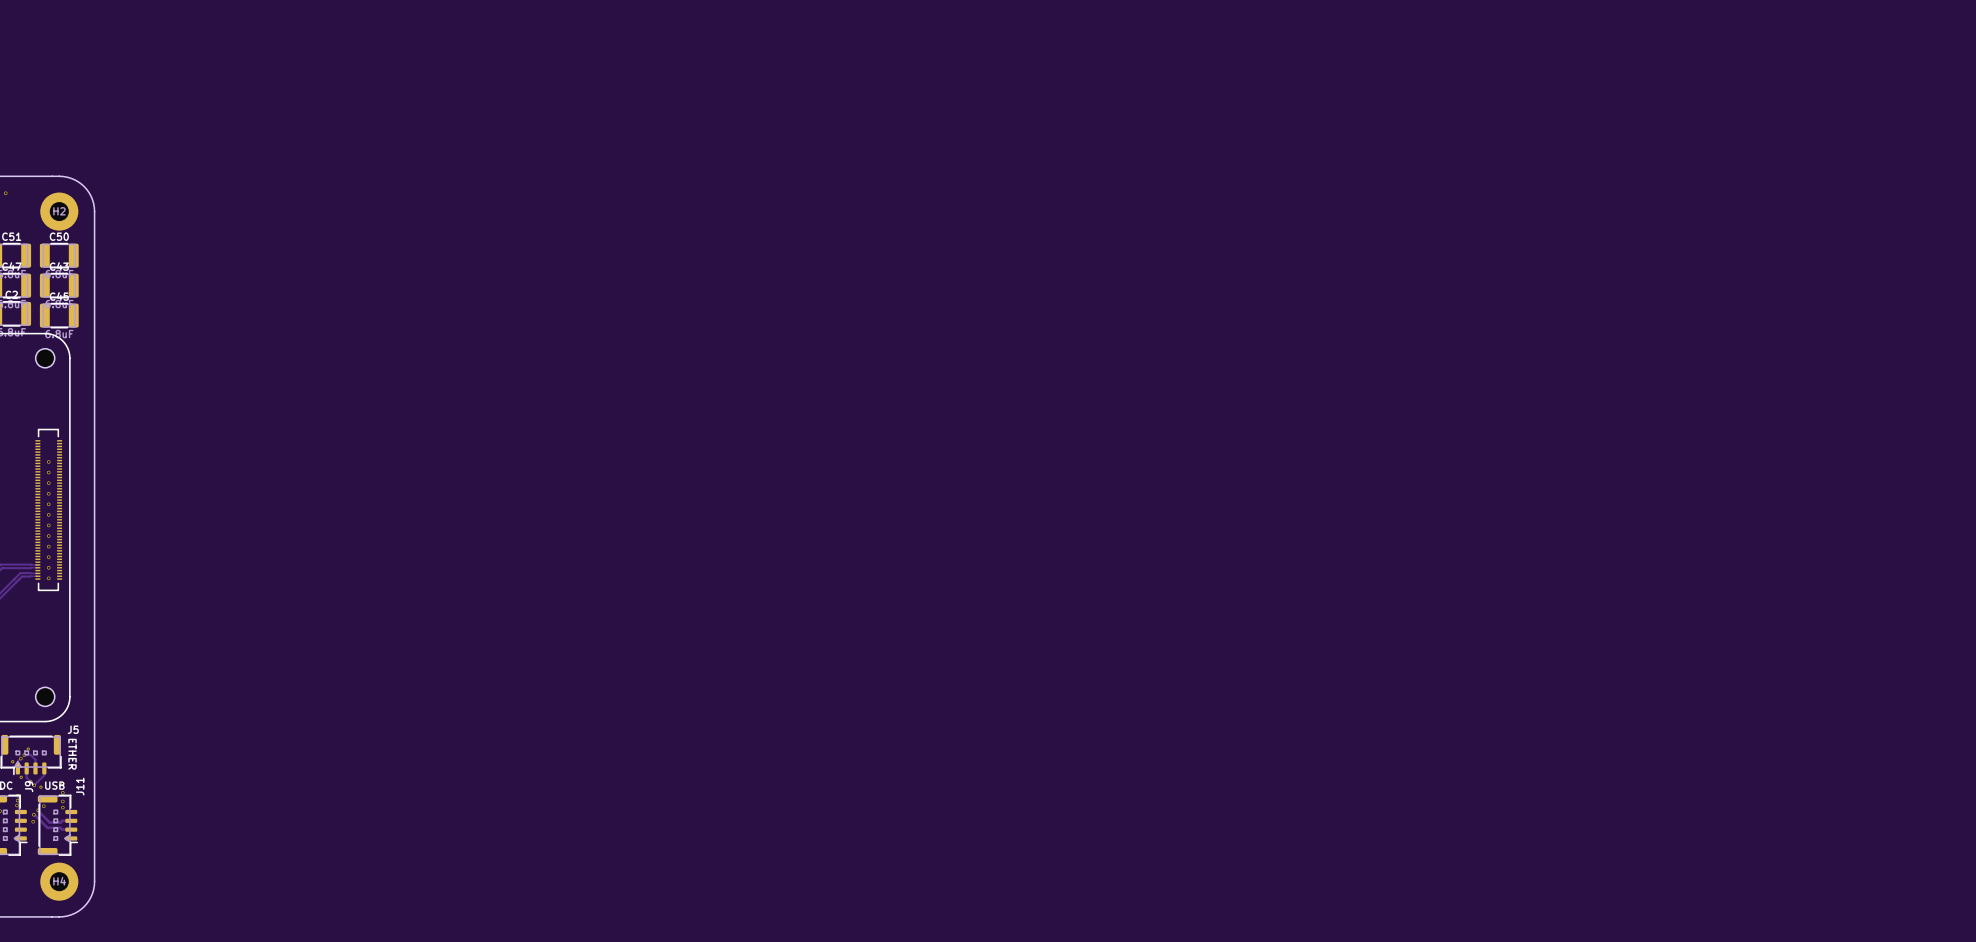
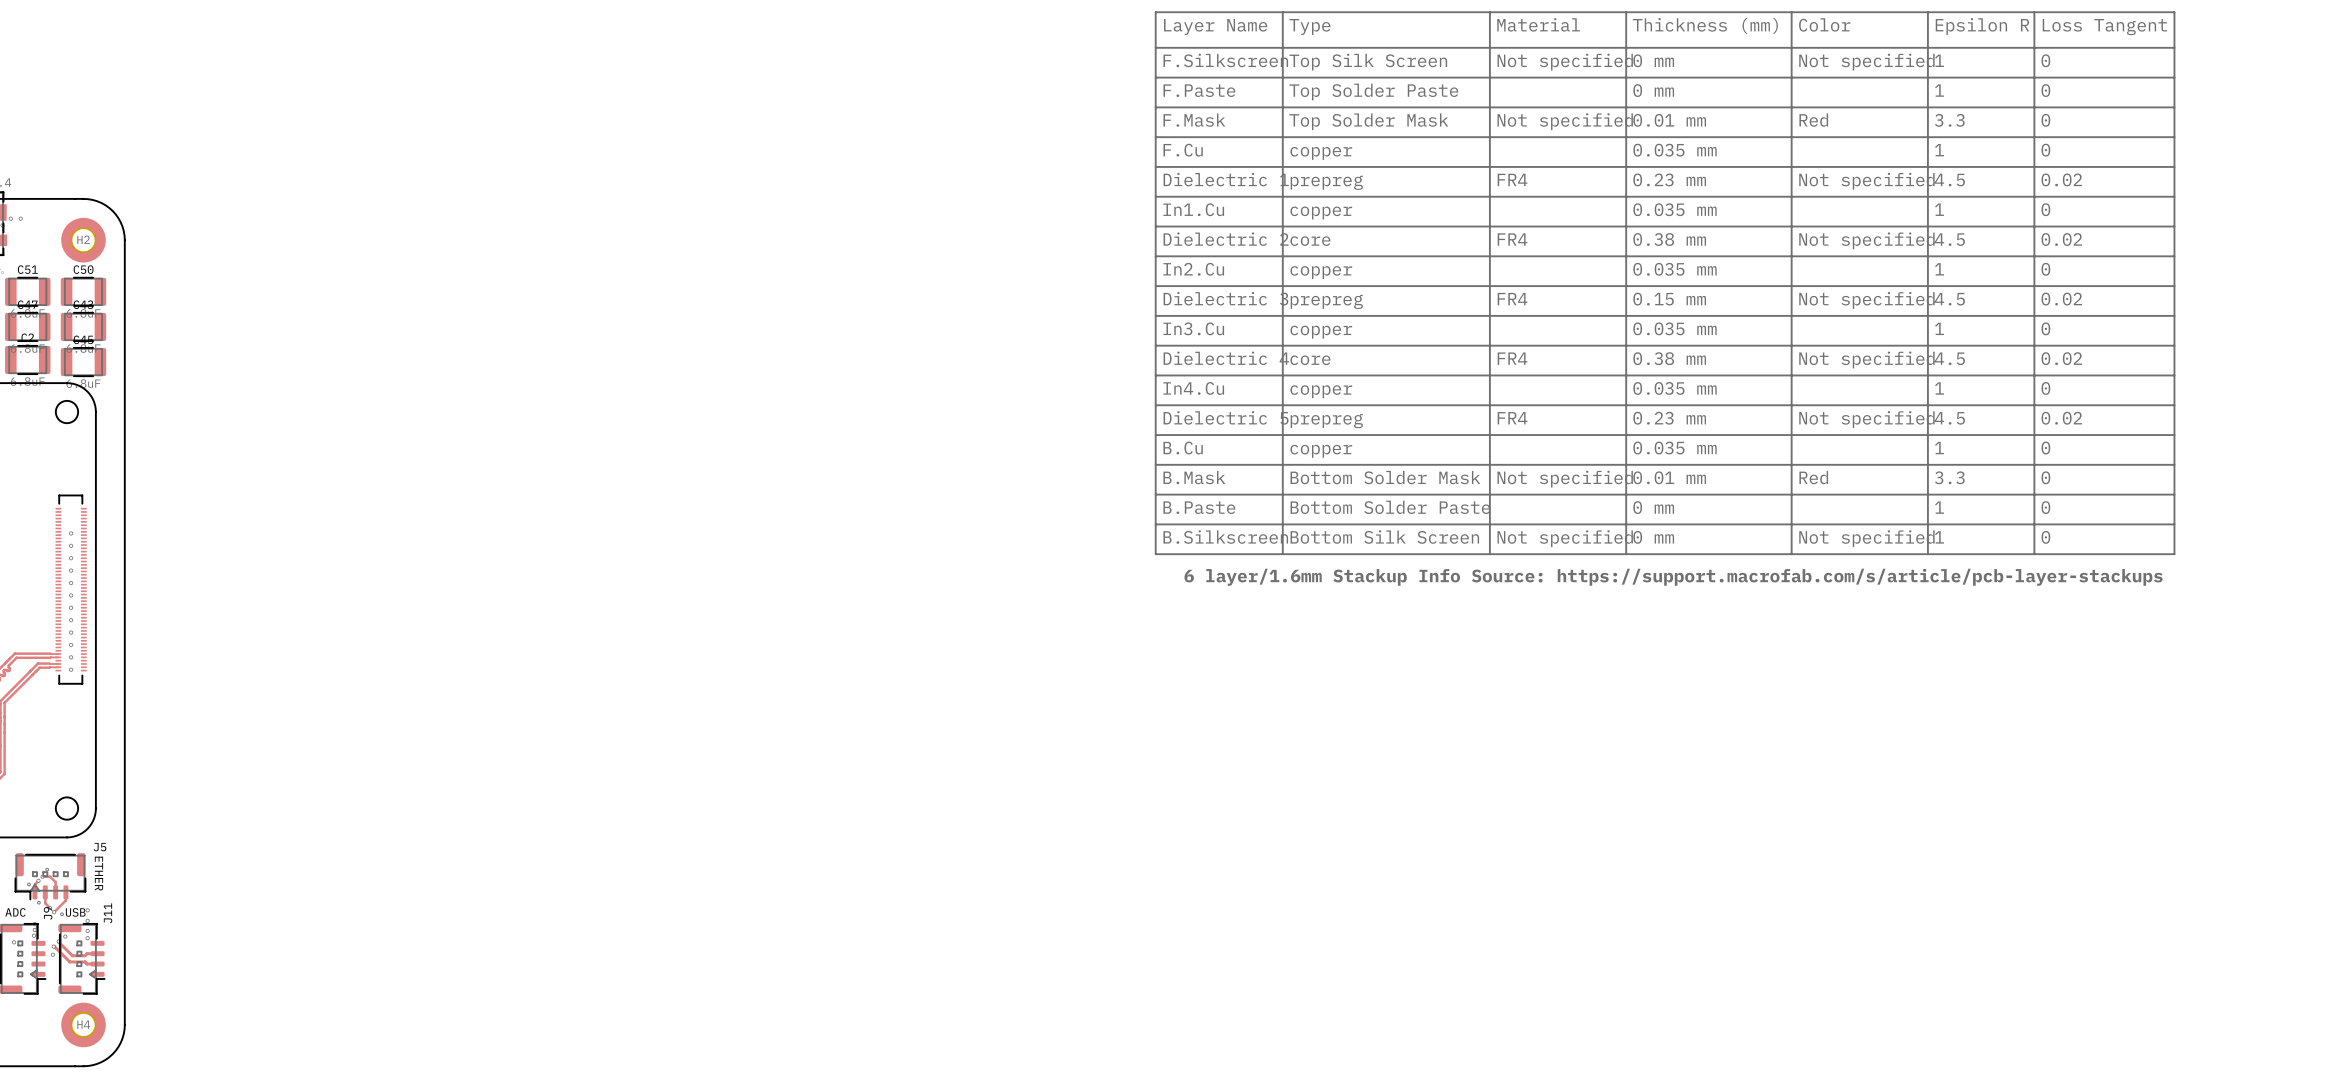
line: none -> (1155, 12) (2174, 12) (2174, 554) (1155, 554) (1155, 12)
line: none -> (1282, 12) (1282, 554)
line: none -> (1489, 12) (1489, 554)
line: none -> (1626, 12) (1626, 554)
line: none -> (1791, 12) (1791, 554)
line: none -> (1927, 12) (1927, 554)
line: none -> (2034, 12) (2034, 554)
text: none -> Material (1538, 24)
text: none -> Color (1824, 24)
text: none -> Layer Name (1215, 26)
text: none -> Type (1309, 26)
text: none -> Thickness (mm) (1705, 25)
text: none -> Epsilon R (1982, 26)
text: none -> Loss Tangent (2104, 27)
line: none -> (1155, 47) (2174, 47)
text: none -> F.Silkscreen (1225, 60)
text: none -> 0 mm (1653, 60)
text: none -> 1 (1939, 60)
text: none -> 0 (2045, 60)
text: none -> Top Silk Screen (1368, 62)
text: none -> Not specified (1565, 62)
text: none -> Not specified (1866, 62)
line: none -> (1155, 77) (2174, 77)
text: none -> F.Paste (1199, 90)
text: none -> 0 mm (1653, 90)
text: none -> 1 (1939, 90)
text: none -> 0 (2045, 90)
text: none -> Top Solder Paste (1373, 91)
line: none -> (1155, 107) (2174, 107)
text: none -> F.Mask (1194, 120)
text: none -> 0.01 mm (1669, 120)
text: none -> Red (1813, 120)
text: none -> 3.3 (1949, 120)
text: none -> 0 (2045, 120)
text: none -> Top Solder Mask (1368, 121)
text: none -> Not specified (1565, 121)
line: none -> (1155, 137) (2174, 137)
text: none -> F.Cu (1183, 150)
text: none -> 0.035 mm (1675, 150)
text: none -> 1 (1939, 150)
text: none -> 0 (2045, 150)
text: none -> copper (1321, 153)
line: none -> (1155, 166) (2174, 166)
text: none -> FR4 (1512, 179)
text: none -> 4.5 (1949, 180)
text: none -> Dielectric 1 (1226, 179)
text: none -> 0.23 mm (1669, 179)
text: none -> 0.02 (2061, 179)
text: none -> Not specified (1866, 181)
text: none -> prepreg (1326, 182)
line: none -> (1155, 196) (2174, 196)
text: none -> In1.Cu (1193, 209)
text: none -> 0.035 mm (1675, 209)
text: none -> 1 (1939, 209)
text: none -> 0 (2045, 209)
text: none -> copper (1321, 213)
line: none -> (1155, 226) (2174, 226)
text: none -> Dielectric 2 (1226, 239)
text: none -> FR4 (1512, 239)
text: none -> 0.38 mm (1669, 239)
text: none -> 4.5 (1949, 239)
text: none -> 0.02 (2061, 239)
text: none -> core (1310, 241)
text: none -> Not specified (1866, 240)
line: none -> (1155, 256) (2174, 256)
text: none -> In2.Cu (1193, 269)
text: none -> 0.035 mm (1675, 269)
text: none -> 1 (1939, 269)
text: none -> 0 (2045, 269)
text: none -> copper (1321, 272)
line: none -> (1155, 286) (2174, 286)
text: none -> Dielectric 3 (1225, 298)
text: none -> FR4 (1512, 299)
text: none -> 0.15 mm (1669, 299)
text: none -> 4.5 (1949, 299)
text: none -> 0.02 (2061, 299)
text: none -> Not specified (1866, 300)
text: none -> prepreg (1326, 301)
line: none -> (1155, 315) (2174, 315)
text: none -> In3.Cu (1193, 328)
text: none -> 0.035 mm (1675, 328)
text: none -> 1 (1939, 328)
text: none -> 0 (2045, 328)
text: none -> copper (1321, 332)
line: none -> (1155, 345) (2174, 345)
text: none -> Dielectric 4 (1226, 358)
text: none -> FR4 (1512, 358)
text: none -> 0.38 mm (1669, 358)
text: none -> 4.5 (1949, 358)
text: none -> 0.02 (2061, 358)
text: none -> core (1310, 360)
text: none -> Not specified (1866, 359)
line: none -> (1155, 375) (2174, 375)
text: none -> In4.Cu (1193, 388)
text: none -> 0.035 mm (1675, 388)
text: none -> 1 (1939, 388)
text: none -> 0 (2045, 388)
text: none -> copper (1321, 391)
line: none -> (1155, 405) (2174, 405)
text: none -> Dielectric 5 (1226, 417)
text: none -> FR4 (1512, 418)
text: none -> 0.23 mm (1669, 418)
text: none -> 4.5 (1949, 418)
text: none -> 0.02 (2061, 418)
text: none -> Not specified (1866, 419)
text: none -> prepreg (1326, 421)
line: none -> (1155, 435) (2174, 435)
text: none -> B.Cu (1183, 448)
text: none -> 0.035 mm (1675, 448)
text: none -> 1 (1939, 448)
text: none -> 0 (2045, 448)
text: none -> copper (1321, 451)
line: none -> (1155, 464) (2174, 464)
text: none -> B.Mask (1194, 477)
text: none -> Bottom Solder Mask (1385, 477)
text: none -> 0.01 mm (1669, 477)
text: none -> Red (1813, 477)
text: none -> 3.3 (1949, 477)
text: none -> 0 (2045, 477)
text: none -> Not specified (1565, 479)
line: none -> (1155, 494) (2174, 494)
text: none -> B.Paste (1199, 507)
text: none -> Bottom Solder Paste (1390, 507)
text: none -> 0 mm (1653, 507)
text: none -> 1 (1939, 507)
text: none -> 0 (2045, 507)
line: none -> (1155, 524) (2174, 524)
text: none -> B.Silkscreen (1225, 537)
text: none -> Bottom Silk Screen (1384, 537)
text: none -> 0 mm (1653, 537)
text: none -> 1 (1939, 537)
text: none -> 0 (2045, 537)
text: none -> Not specified (1565, 538)
text: none -> Not specified (1866, 538)
text: none -> 6 layer/1.6mm Stackup Info Source: https://support.macrofab.com/s/article/pcb-layer-stackups (1673, 577)

